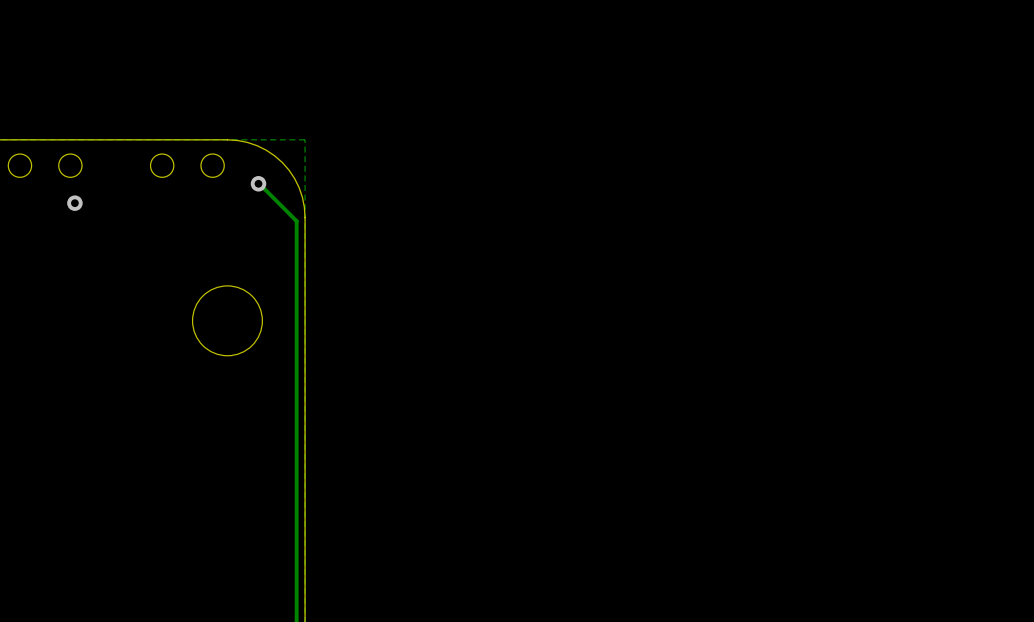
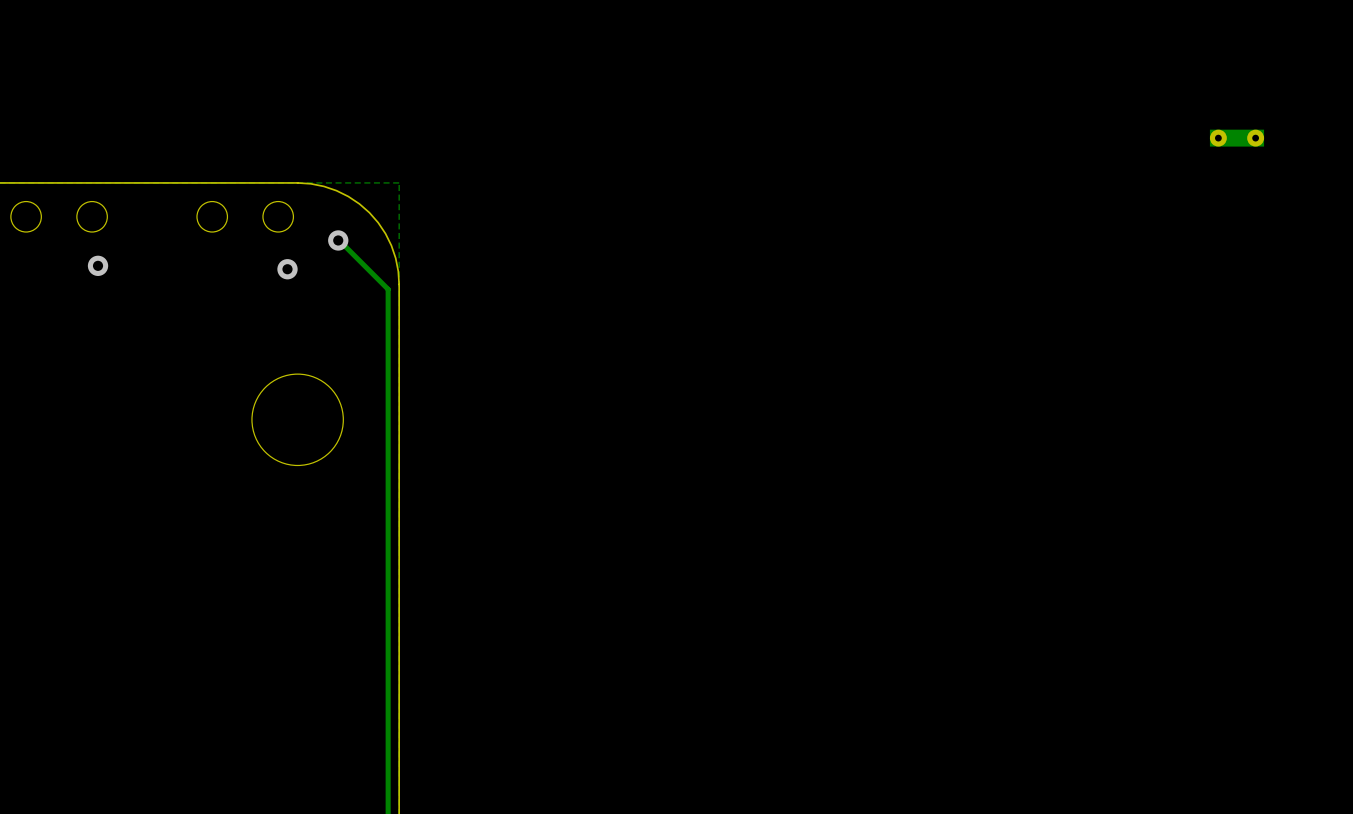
part: none -> (1237, 138)
via: none -> (287, 269)

